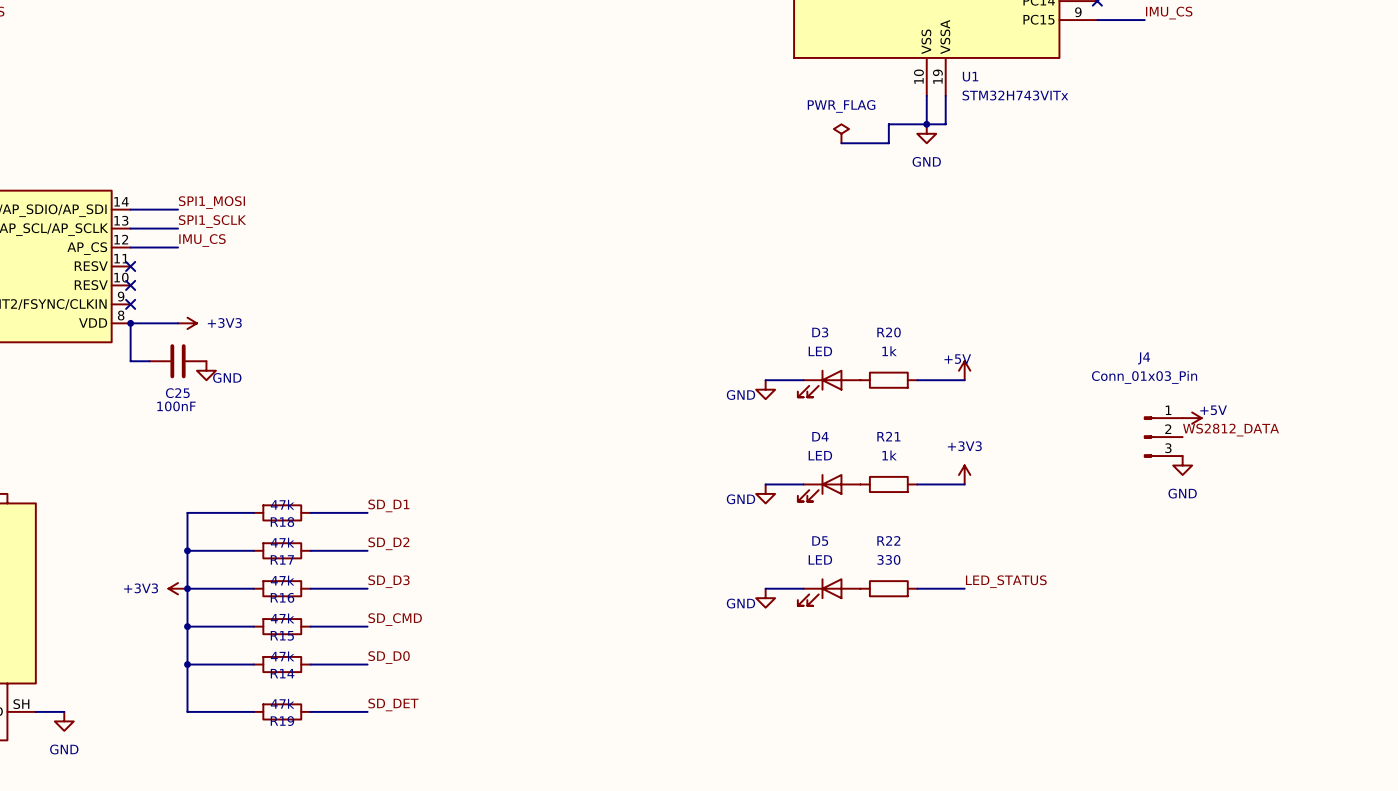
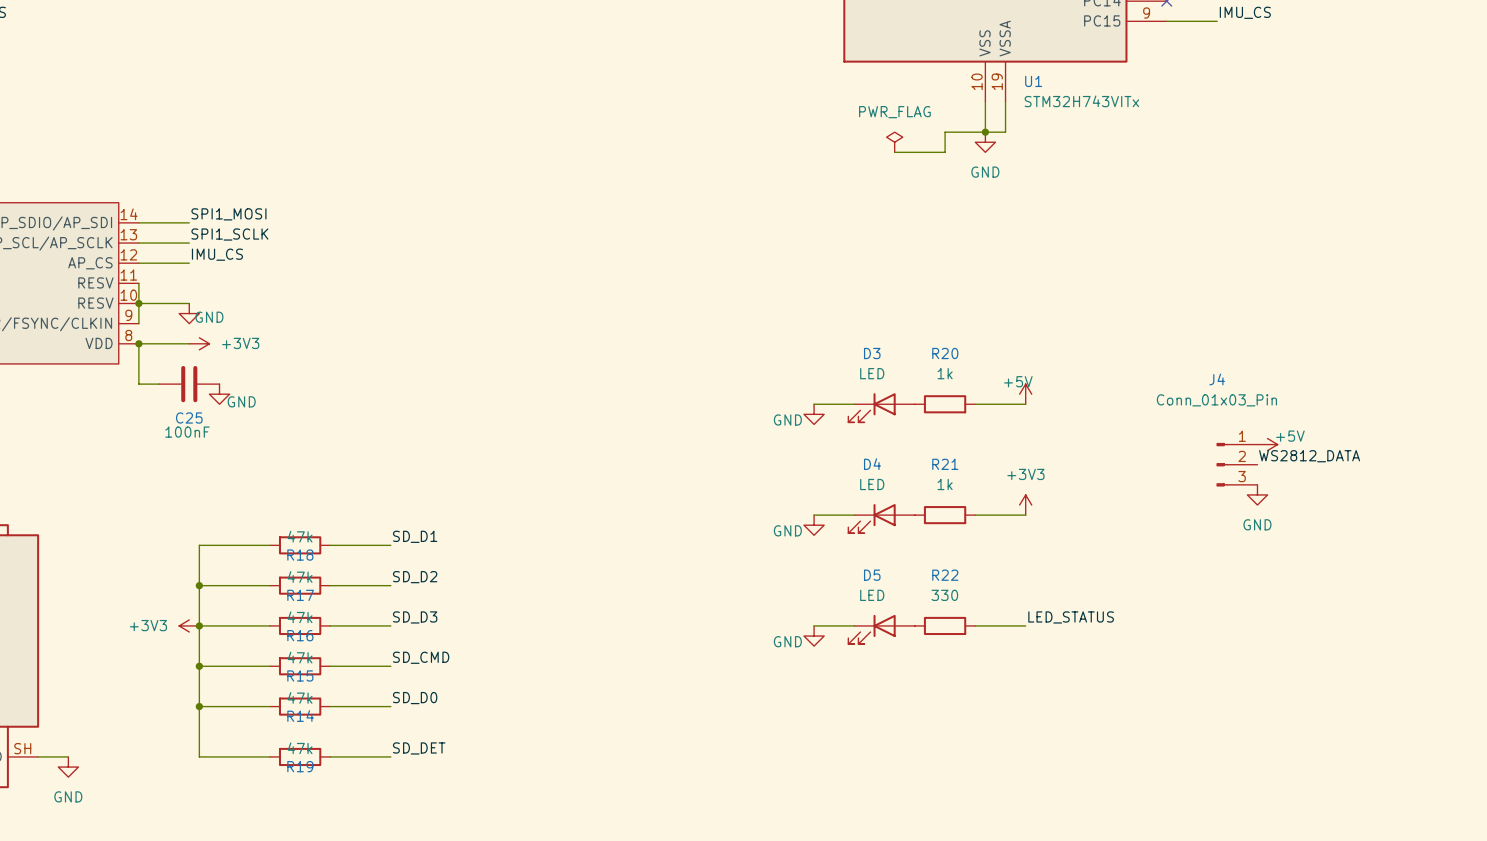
wire: none -> (138, 283) (138, 323)
no-connect mark: (130, 266) -> none
wire: none -> (138, 303) (189, 303)
no-connect mark: (130, 285) -> none
junction: none -> (138, 303)
power symbol: none -> GND (189, 313)
no-connect mark: (130, 304) -> none

